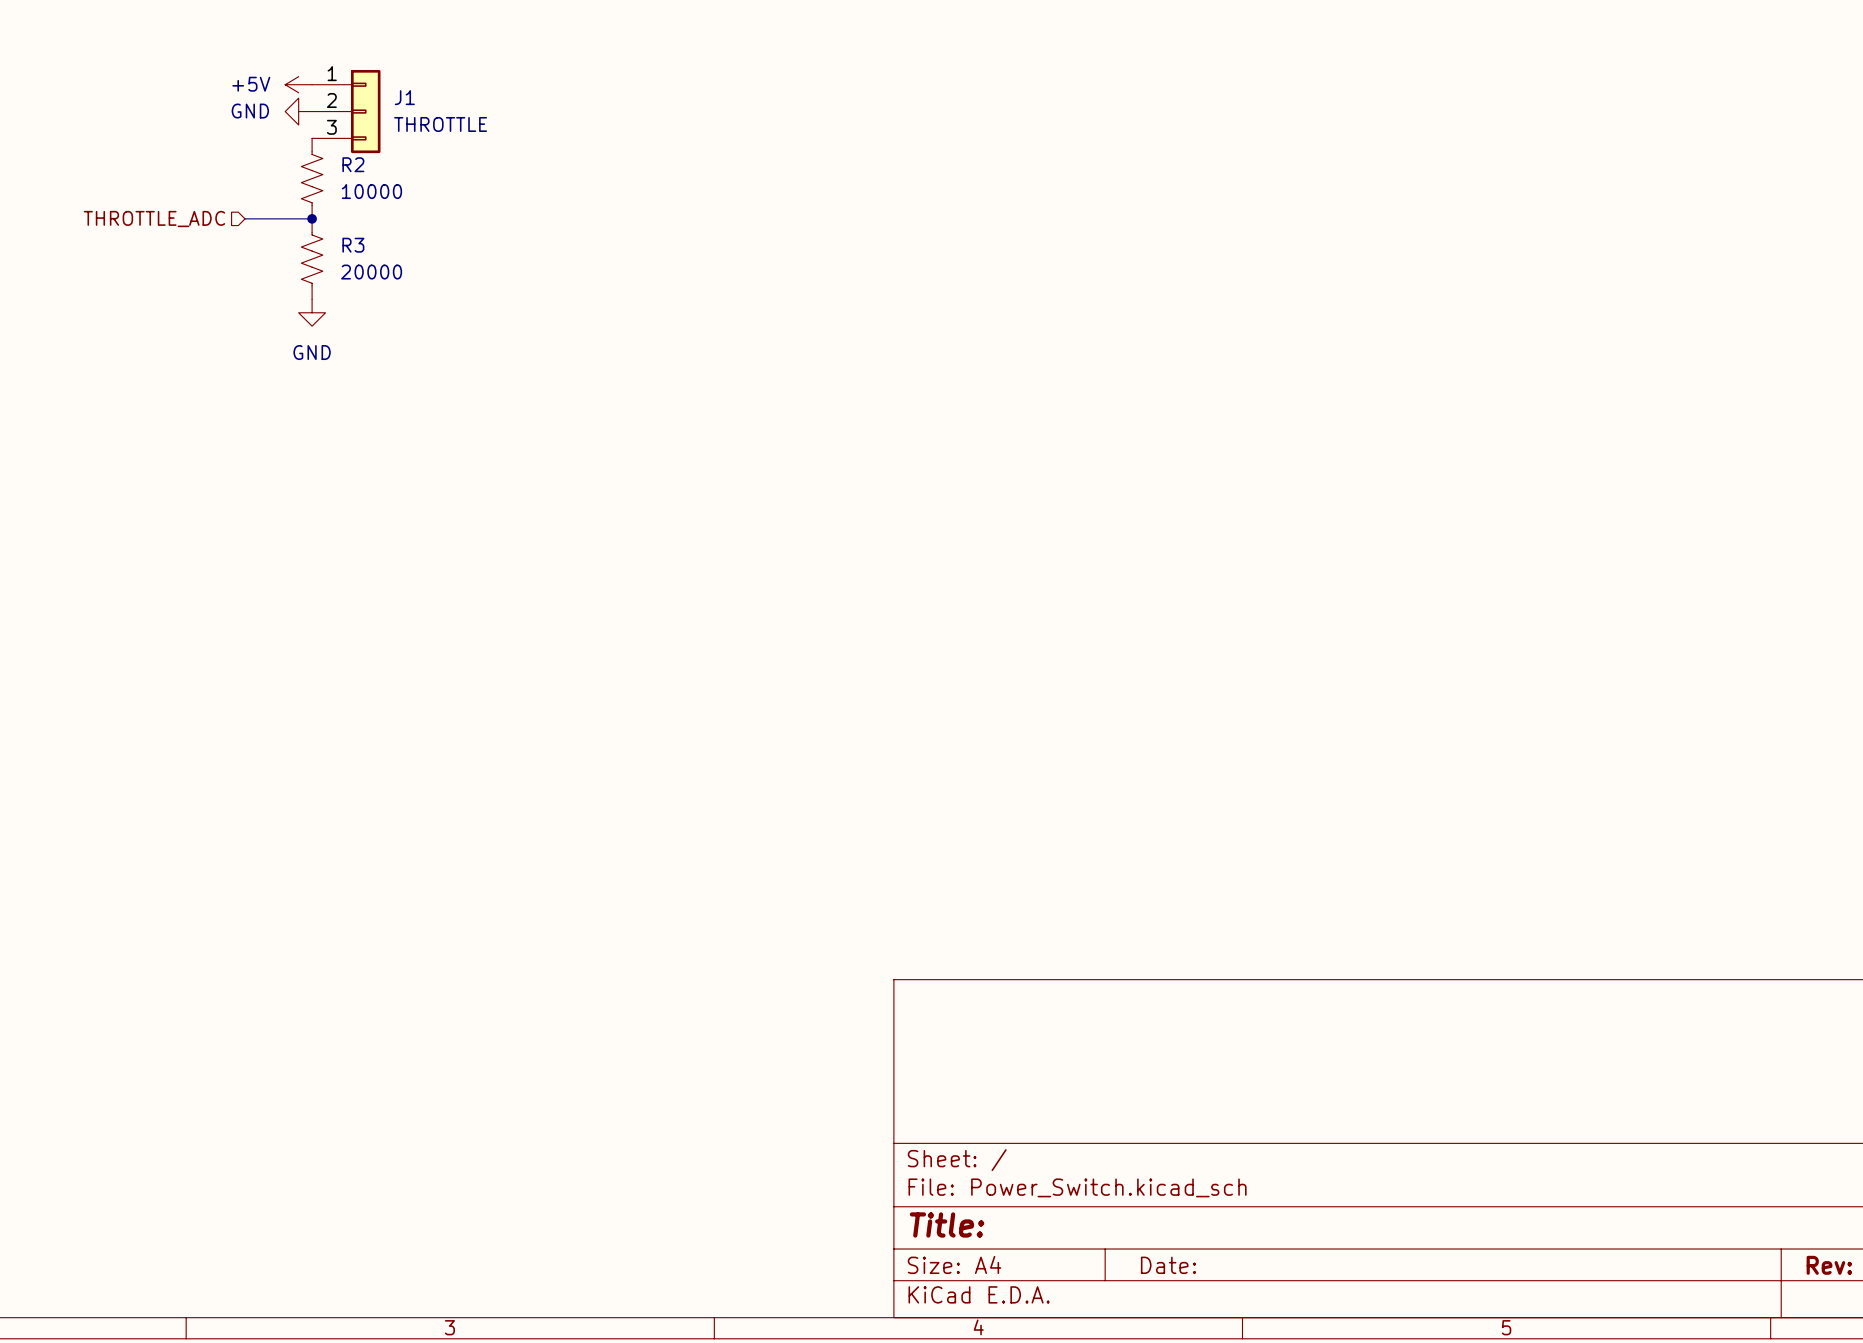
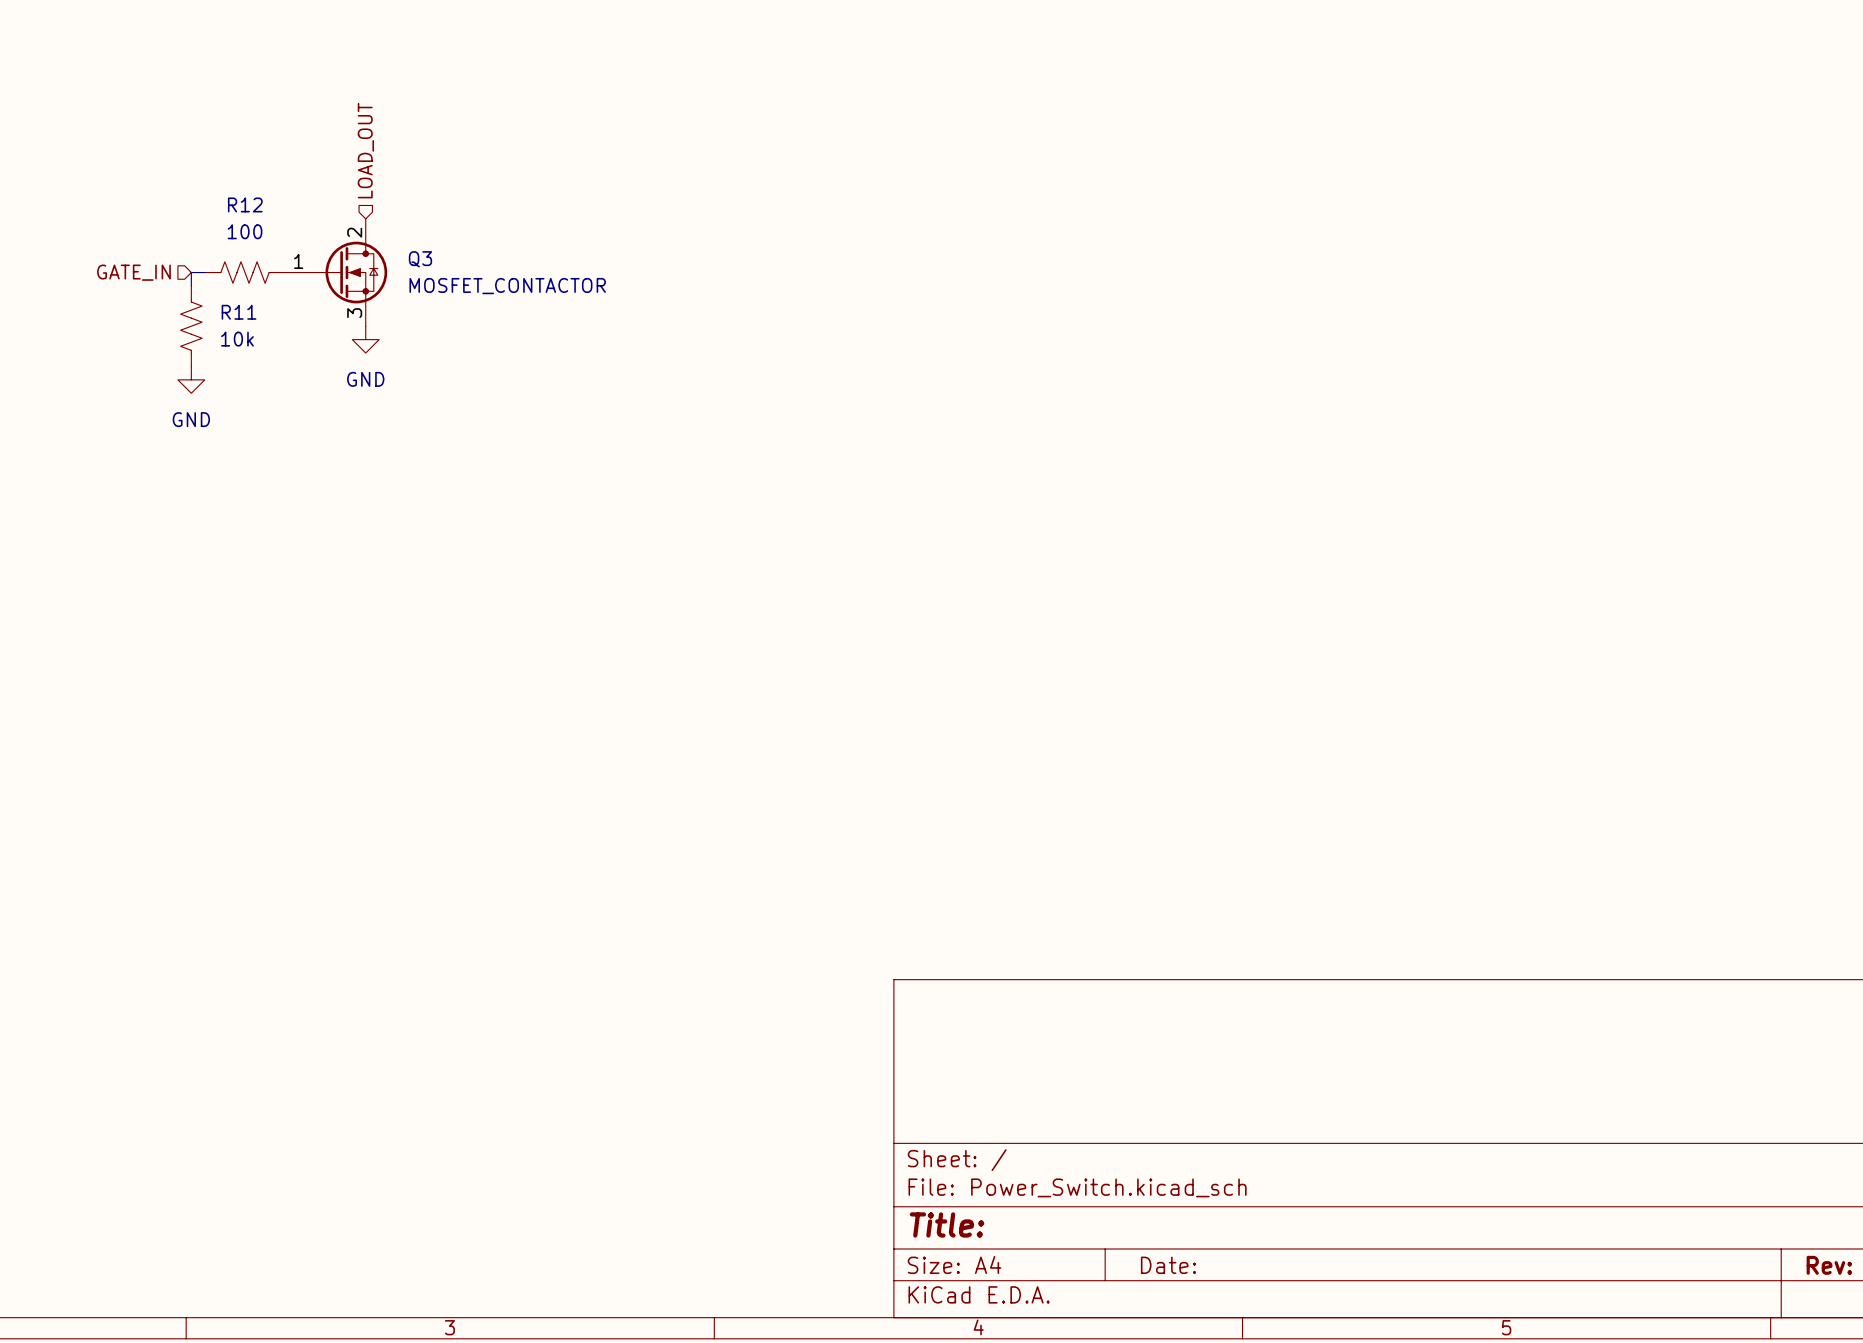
power symbol: +5V (298, 84) -> none
power symbol: GND (298, 111) -> none
J1: THROTTLE (346, 111) -> none
hierarchical label: none -> LOAD_OUT (365, 150)
R2: 10000 (312, 178) -> none
wire: (245, 218) (312, 218) -> none
junction: (312, 218) -> none
hierarchical label: THROTTLE_ADC (154, 219) -> none
R3: 20000 (312, 259) -> none
hierarchical label: none -> GATE_IN (133, 272)
wire: none -> (204, 272) (191, 272) (191, 285)
R12: none -> 100 (245, 272)
Q3: none -> MOSFET_CONTACTOR (336, 272)
power symbol position: GND (312, 312) -> GND (365, 339)
R11: none -> 10k (191, 326)
power symbol: none -> GND (191, 379)

